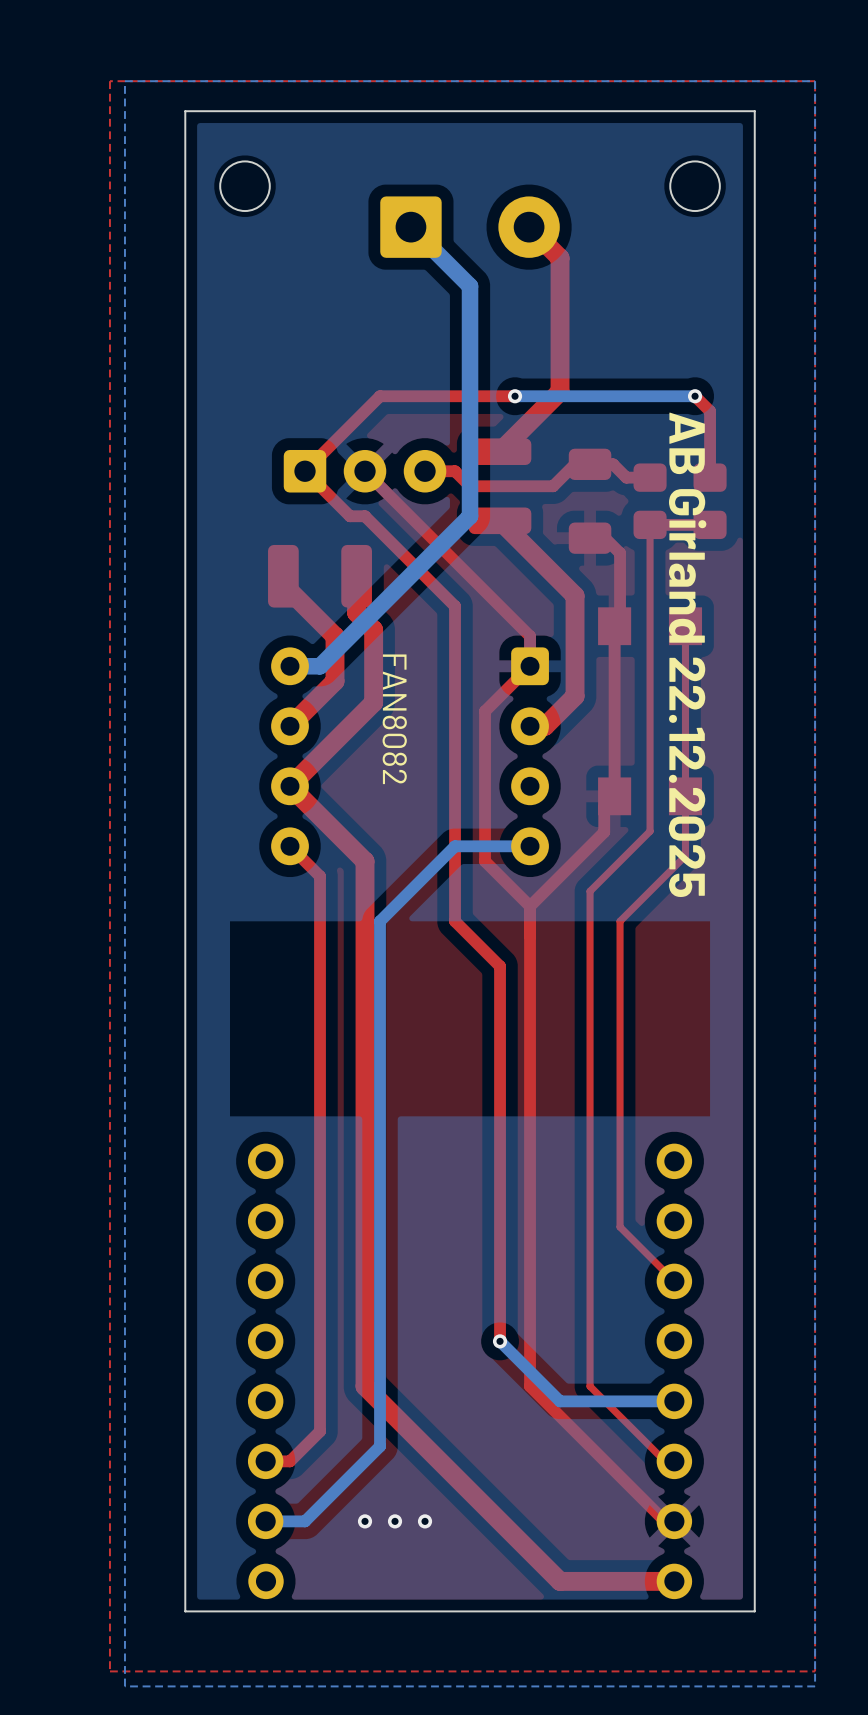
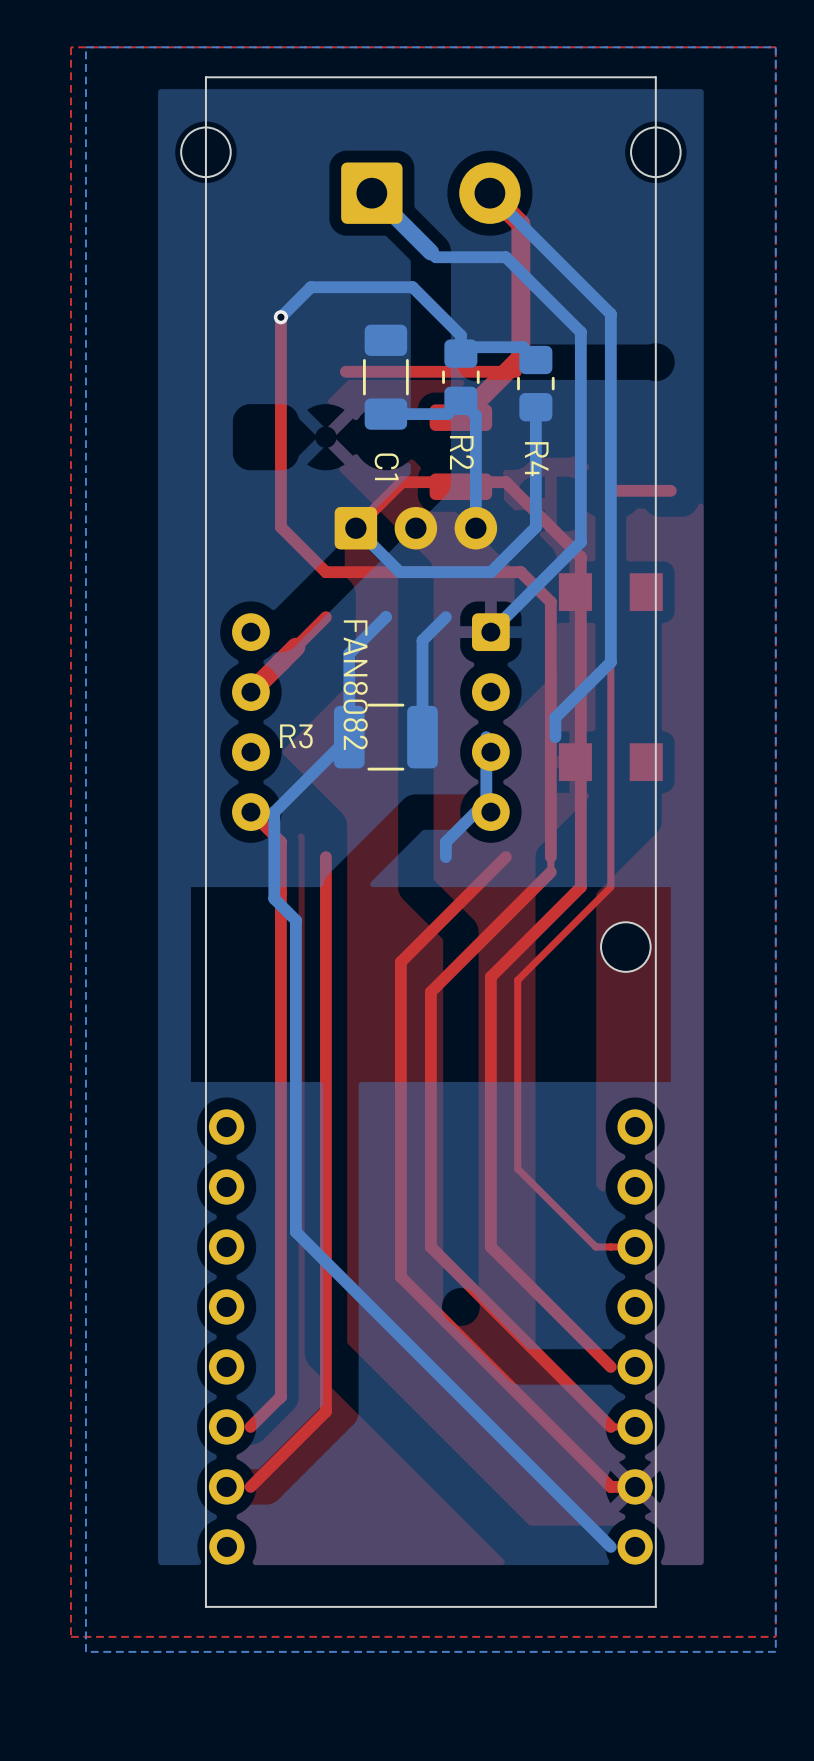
board edge: (695, 111) (754, 111) (754, 1611) (185, 1611) (185, 111) (245, 111) -> (655, 77) (655, 1606) (205, 1606) (205, 77)
bottom track: none -> (489, 193) (610, 314) (610, 662) (555, 717) (555, 737)
bottom track: (470, 286) (470, 516) (320, 666) (290, 666) -> (430, 252) (435, 257) (505, 257) (580, 332) (580, 542) (505, 617)
bottom track: none -> (280, 317) (310, 287) (412, 287) (460, 335) (460, 353) (467, 347) (523, 347) (535, 359)
via: none -> (280, 317)
top track: (515, 396) (380, 396) (305, 471) (350, 516) (365, 516) (455, 606) (455, 921) (500, 966) (500, 1341) -> none
via: (515, 396) -> none
top track: (695, 396) (710, 411) (710, 477) -> none
bottom track: (695, 396) (515, 396) -> none
via: (695, 396) -> none
top track: none -> (515, 371) (345, 371)
bottom track: none -> (535, 407) (535, 527) (490, 572) (399, 572) (355, 528)
bottom track: none -> (385, 414) (447, 414) (460, 400) (475, 415) (475, 528)
top track: (365, 471) (530, 636) (530, 666) (485, 711) (485, 861) (530, 906) (530, 1011) -> none
part position: (365, 471) -> (415, 528)
top track: (425, 471) (455, 471) (470, 486) (553, 486) (575, 464) (613, 464) (626, 477) (650, 477) -> none
C1 side: top (590, 501) -> bottom (385, 377)
R2 side: top (650, 501) -> bottom (460, 377)
R4 side: top (710, 501) -> bottom (535, 383)
top track: (500, 520) (575, 595) (575, 696) (545, 726) (530, 726) -> none
top track: (590, 538) (605, 538) (620, 553) (620, 591) -> (355, 528) (401, 482) (505, 482) (580, 557)
top track: (283, 576) (283, 584) (335, 636) (335, 681) -> (325, 617) (295, 647)
R3 side: top (320, 576) -> bottom (385, 737)
top track: (356, 576) (356, 612) (373, 629) (373, 702) (290, 786) (365, 861) (365, 891) -> none
top track: (620, 620) (614, 626) (614, 796) (604, 806) (604, 832) (545, 891) -> (580, 586) (580, 887) (490, 977)
top track: (685, 626) (685, 855) (620, 921) (620, 1227) (674, 1281) -> (610, 797) (610, 887) (517, 980) (517, 1168) (595, 1246) (635, 1246)
bottom track: none -> (385, 617) (349, 653) (349, 737) (274, 812) (274, 898) (295, 920) (295, 1231) (610, 1546)
bottom track: none -> (445, 617) (422, 640) (422, 737)
text: AB Girland 22.12.2025 (687, 654) -> none
bottom track: none -> (486, 737) (486, 801) (445, 842) (445, 857)
top track: (650, 831) (590, 891) -> (280, 317) (280, 527) (325, 572) (520, 572) (550, 602) (550, 857)
bottom track: (530, 846) (455, 846) (380, 921) (380, 1446) (305, 1521) (265, 1521) -> none
top track width: thick (365, 891) (365, 1386) -> thin (325, 857) (325, 1351)
top track: none -> (490, 872) (400, 962) (400, 1276) (610, 1486) (625, 1486)
top track: (590, 906) (590, 1386) (665, 1461) -> (550, 872) (430, 992) (430, 1246) (610, 1426) (625, 1426)
part: none -> (625, 947)
top track: (530, 1281) (530, 1386) (665, 1521) -> (490, 1246) (610, 1366)
bottom track: (500, 1341) (560, 1401) (674, 1401) -> none
via: (500, 1341) -> none
top track: (365, 1386) (560, 1581) (682, 1581) -> (325, 1351) (325, 1411) (250, 1486)
top track: (318, 1433) (290, 1461) (257, 1461) -> (278, 1398) (250, 1426)
via: (365, 1521) -> none
via: (395, 1521) -> none
via: (425, 1521) -> none

